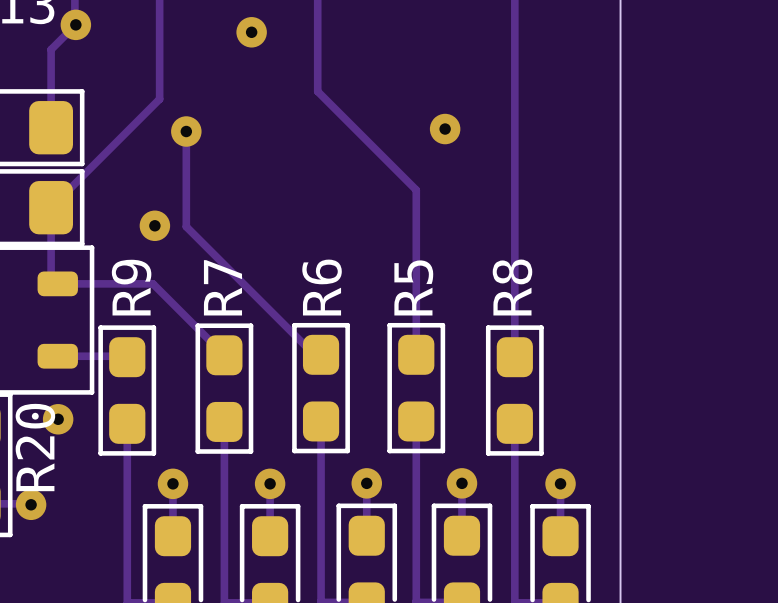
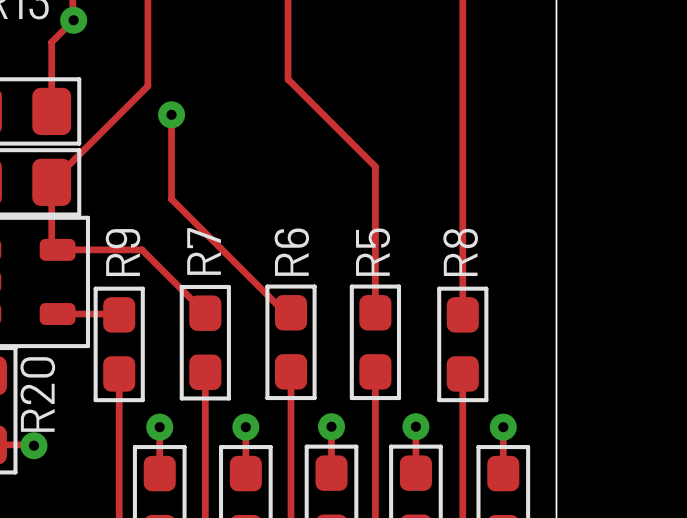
via: (251, 32) -> none
via: (445, 129) -> none
via: (154, 225) -> none
via: (58, 419) -> none

